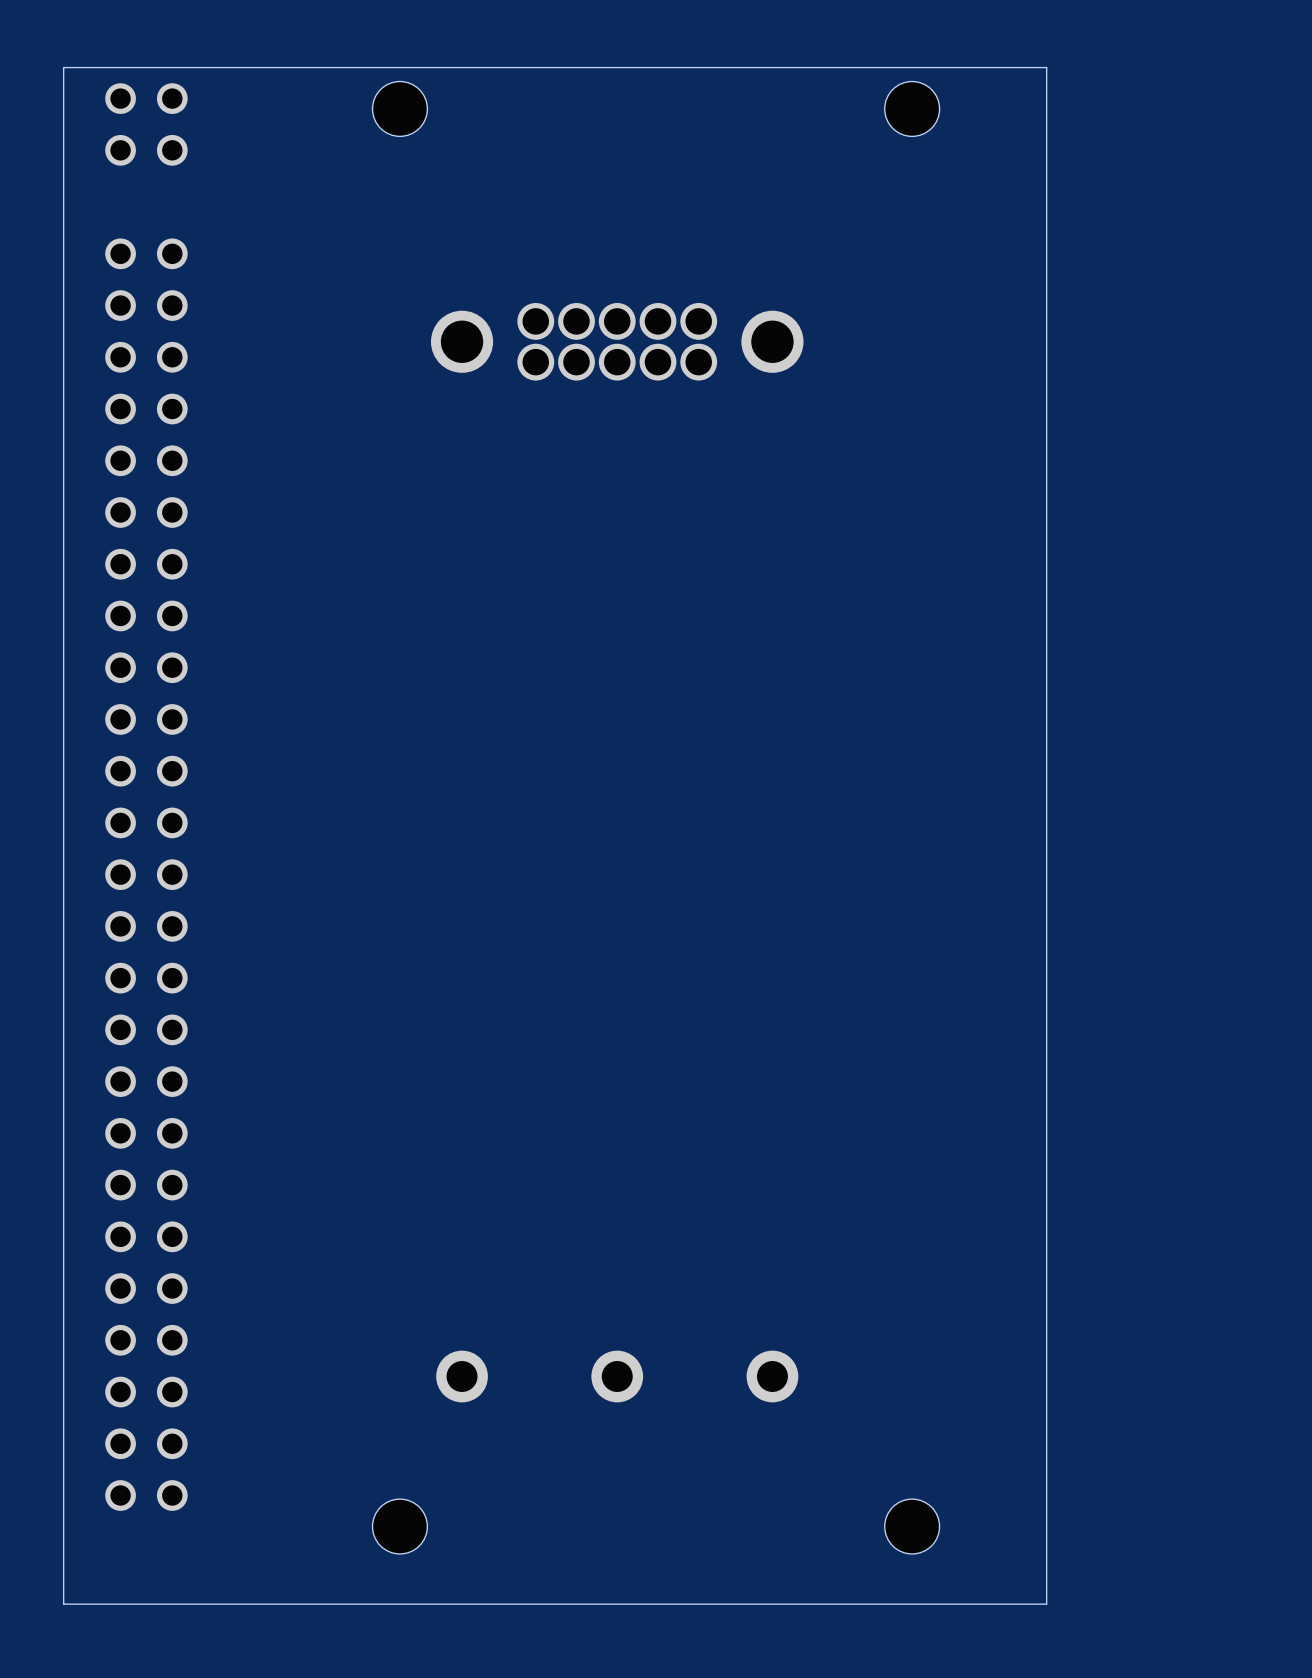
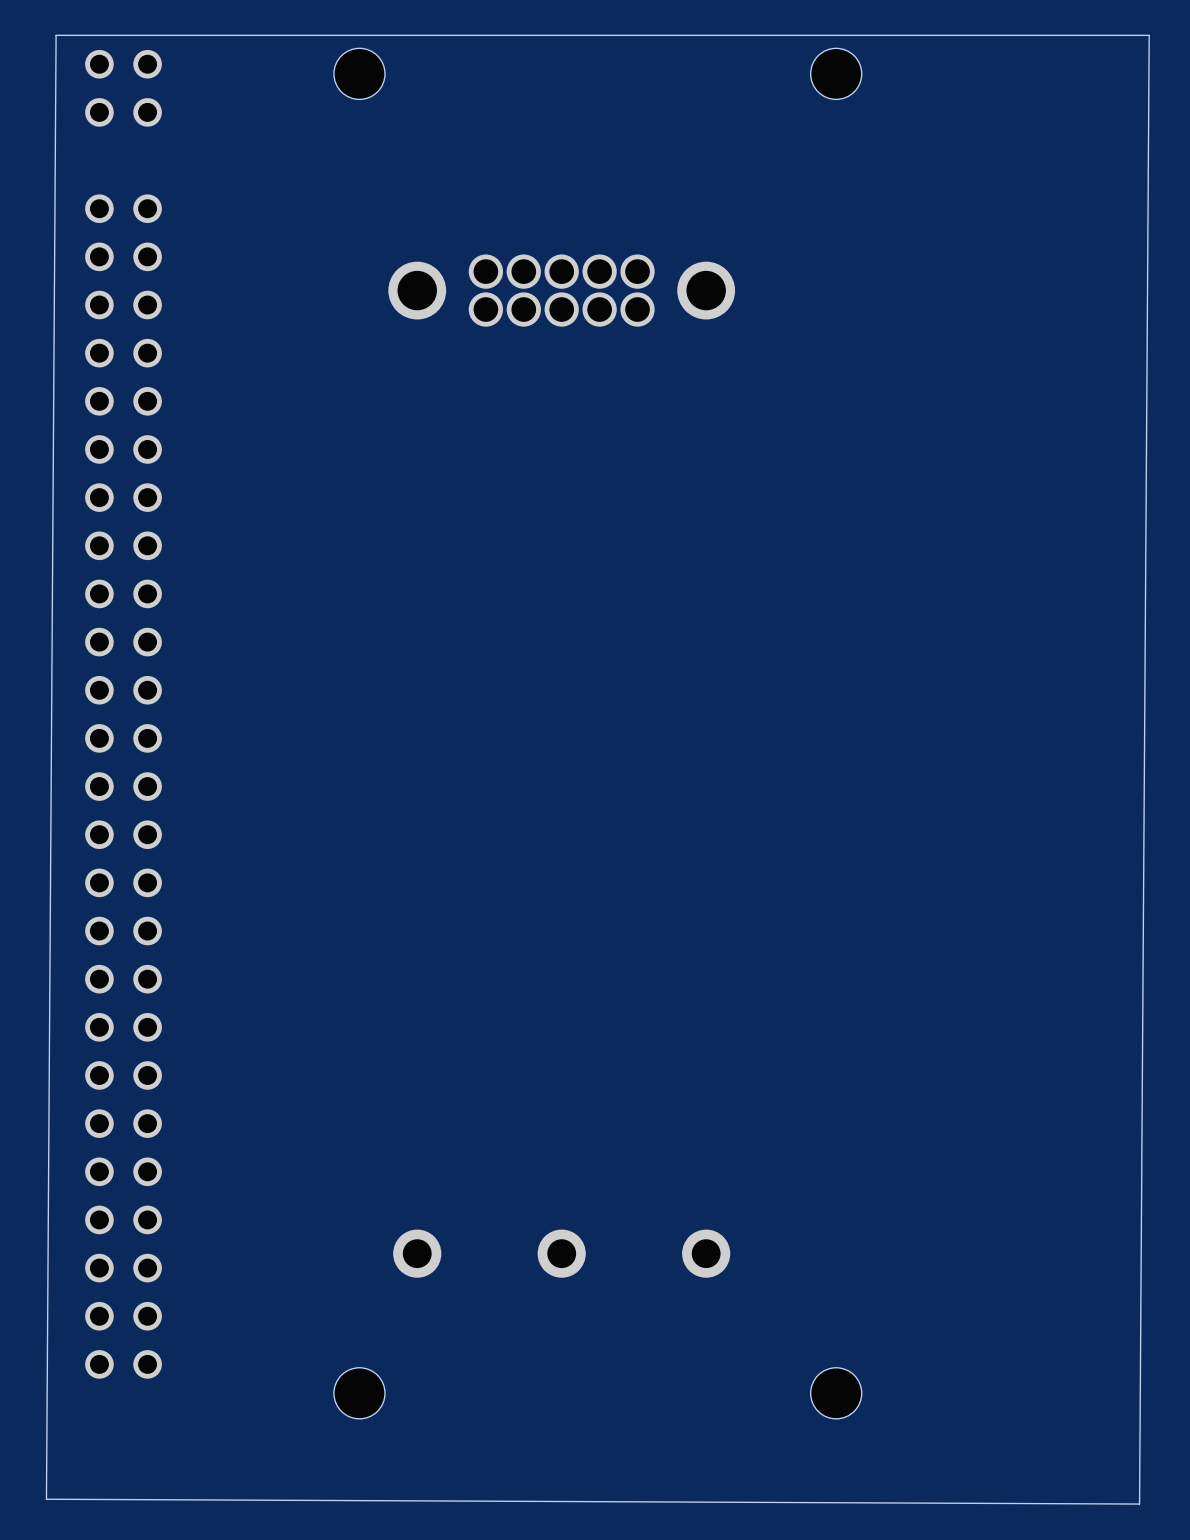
board edge: (1046, 67) (1046, 1604) (63, 1604) (63, 67) (74, 67) -> (961, 35) (1149, 35) (1139, 1504) (46, 1499) (56, 35)

